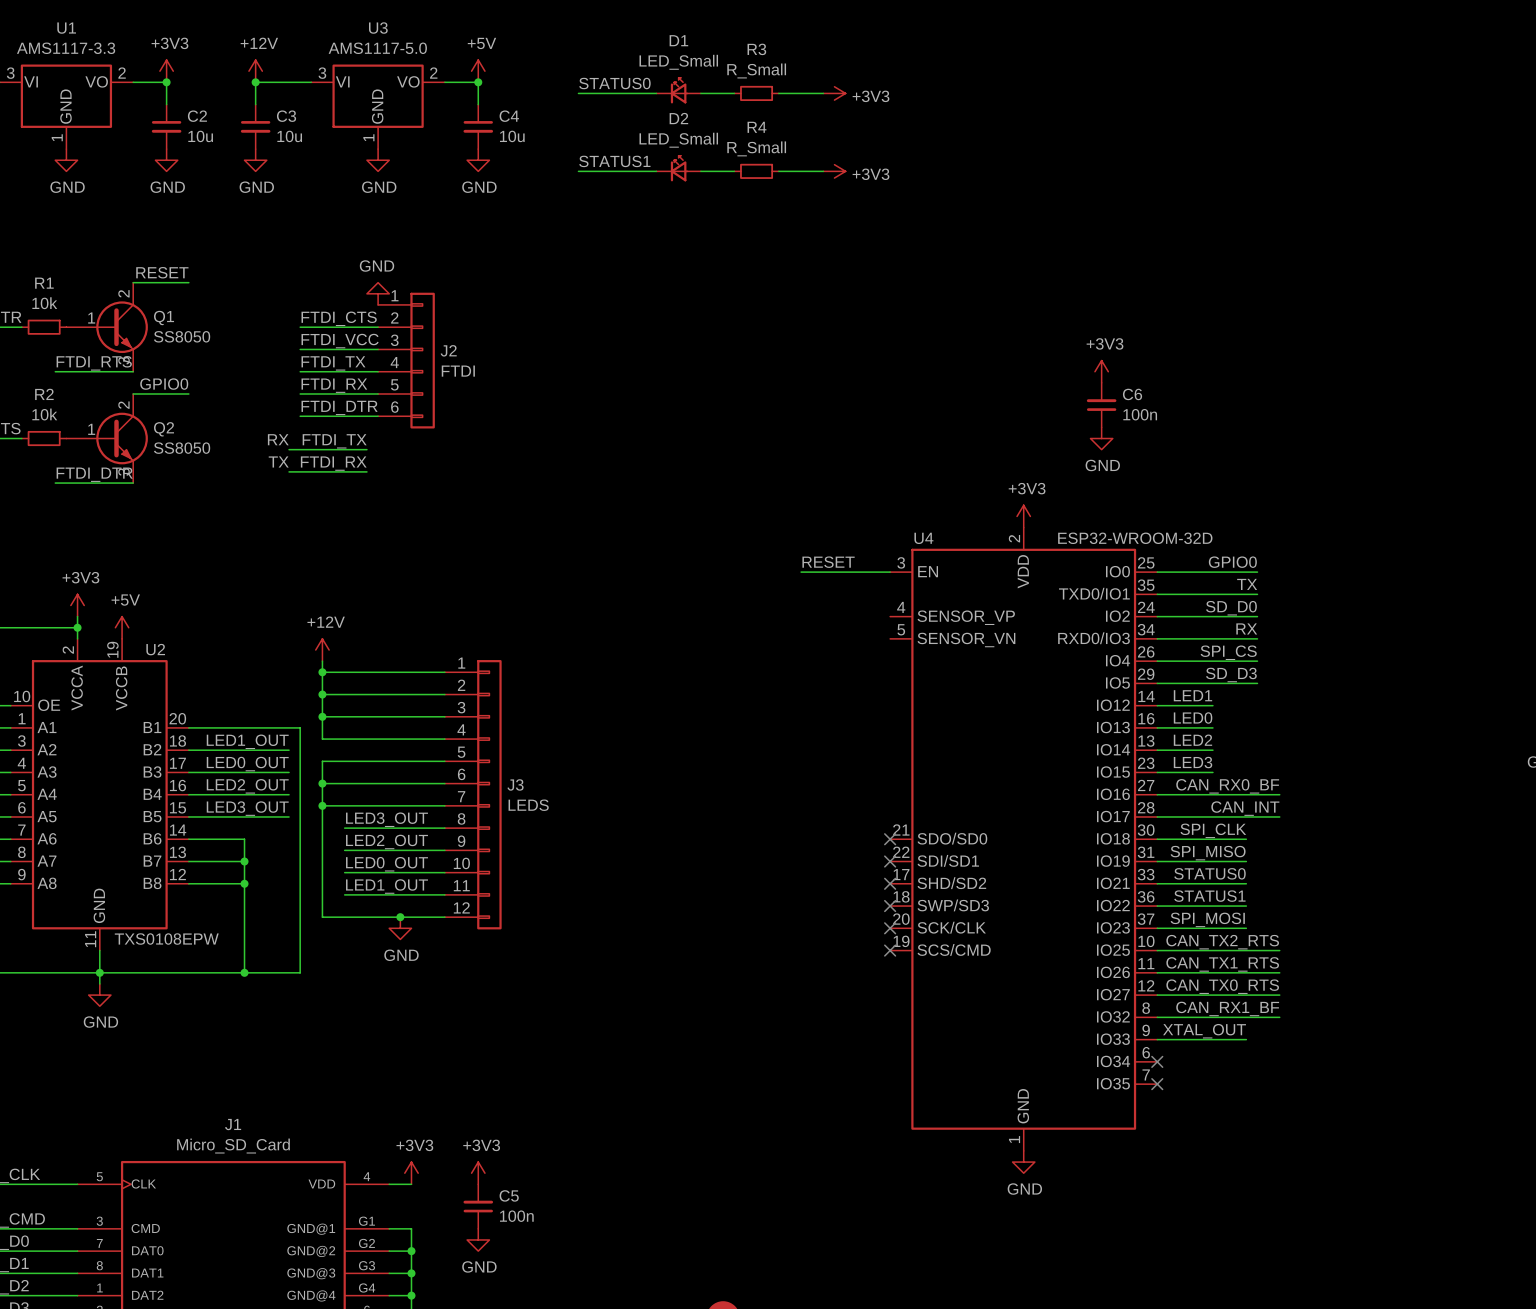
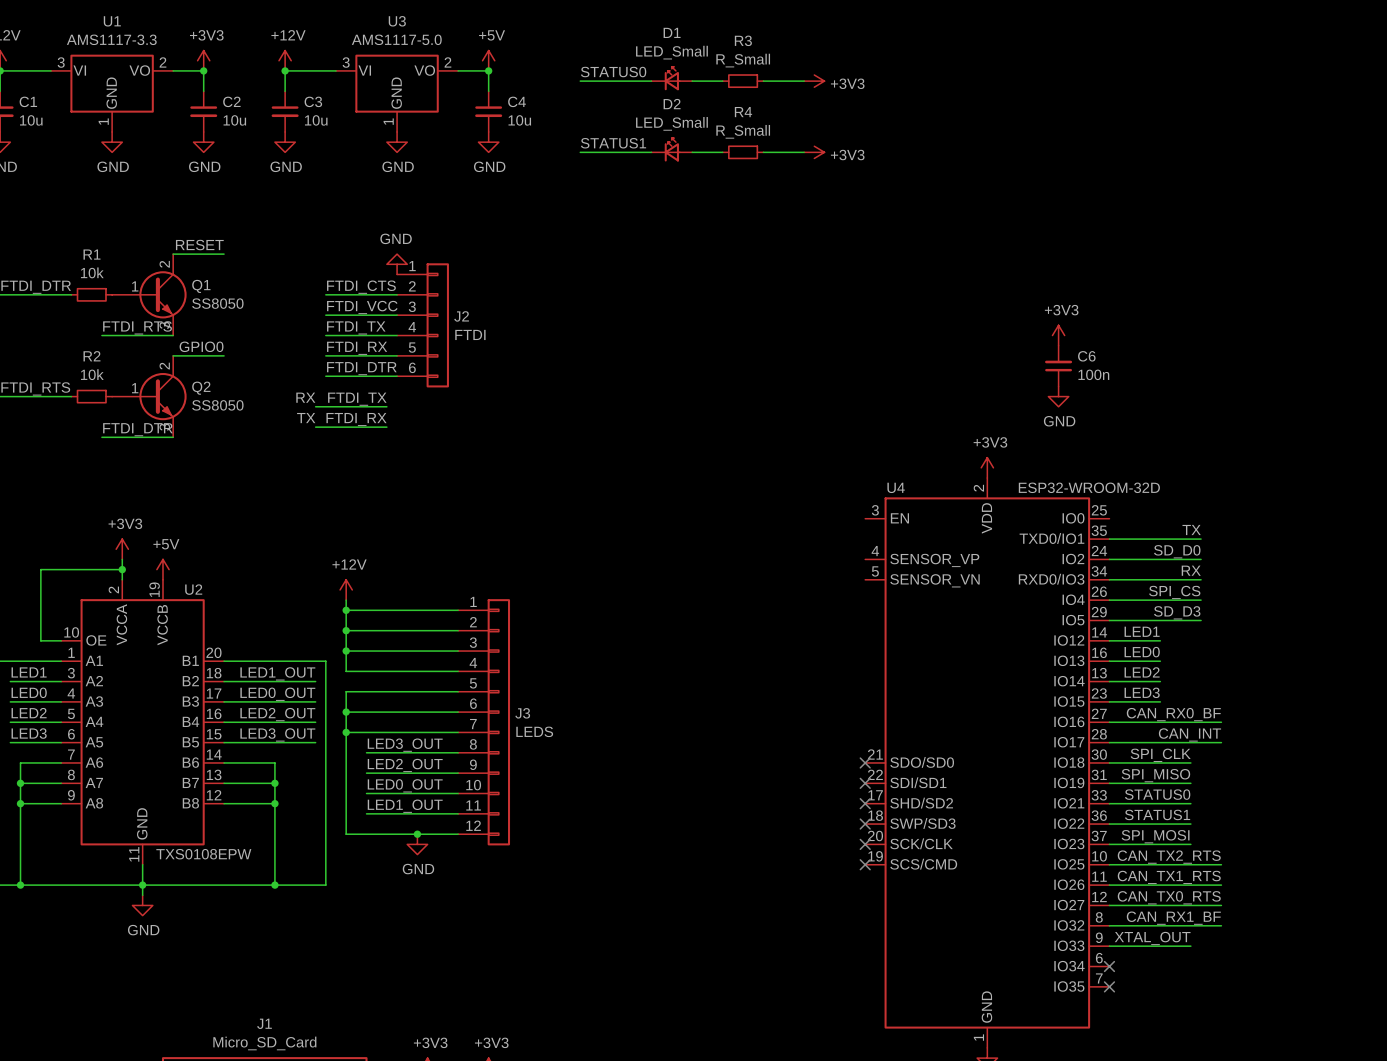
label: RESET (828, 562) -> none
label: GPIO0 (1232, 562) -> none
wire: (801, 572) (890, 572) -> none
wire: (1157, 572) (1257, 572) -> none

